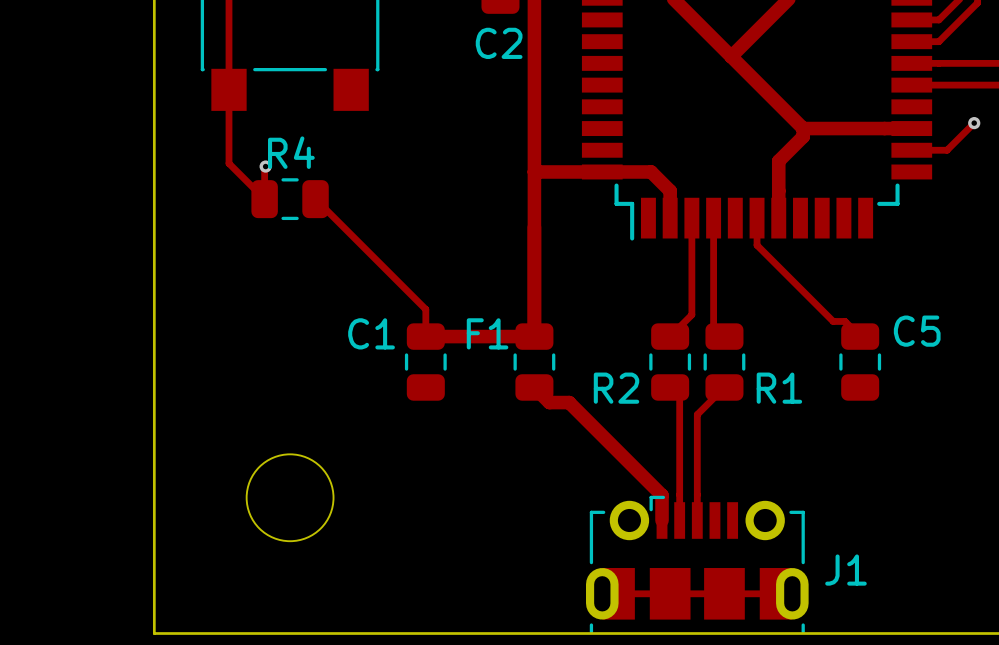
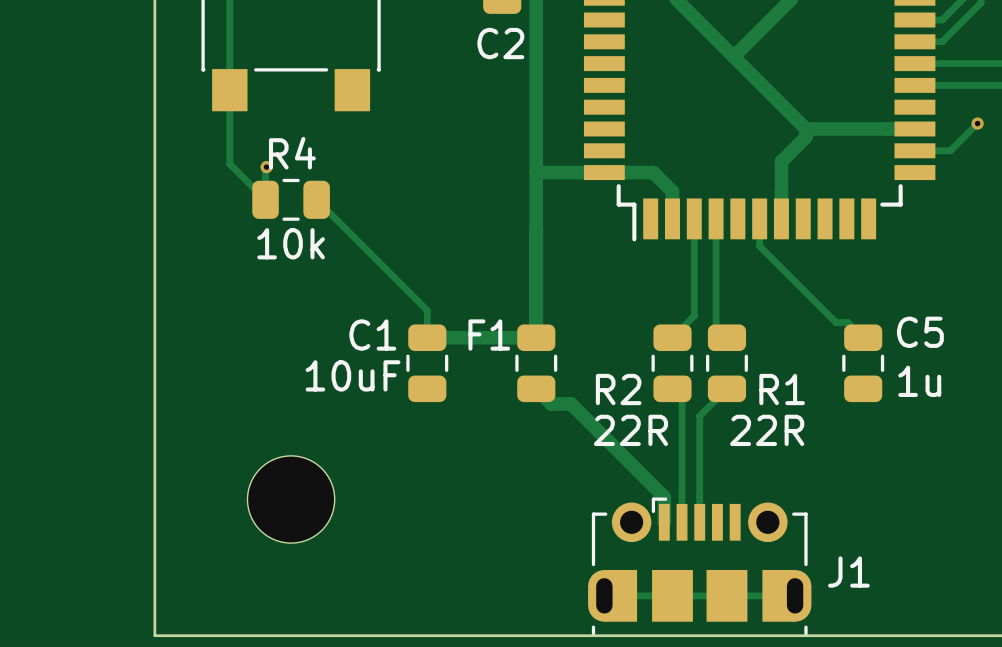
R4 value: none -> 10k (291, 243)
C1 value: none -> 10uF (353, 375)
C5 value: none -> 1u (919, 381)
R2 value: none -> 22R (630, 430)
R1 value: none -> 22R (767, 430)

